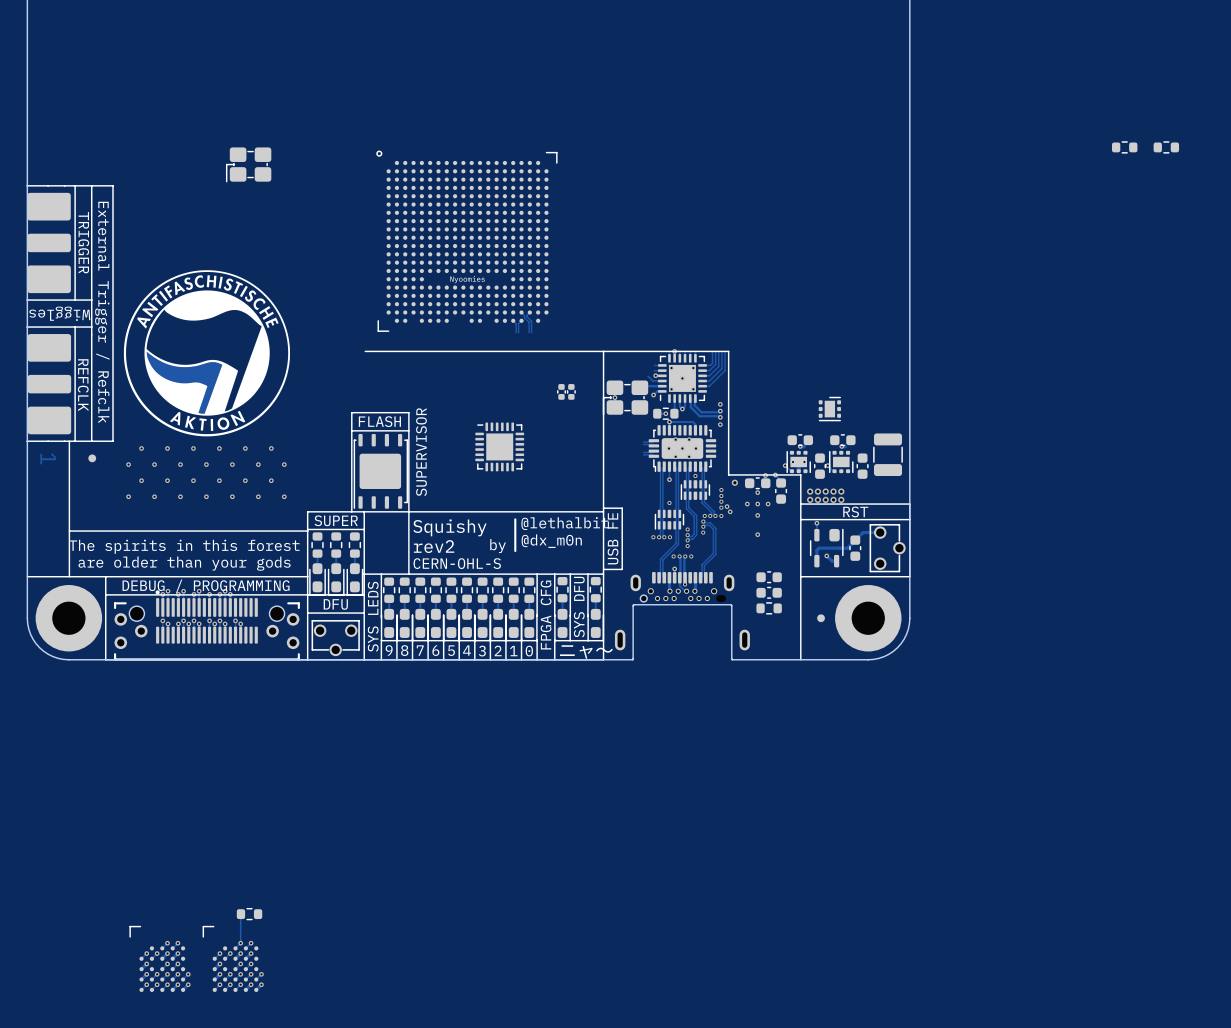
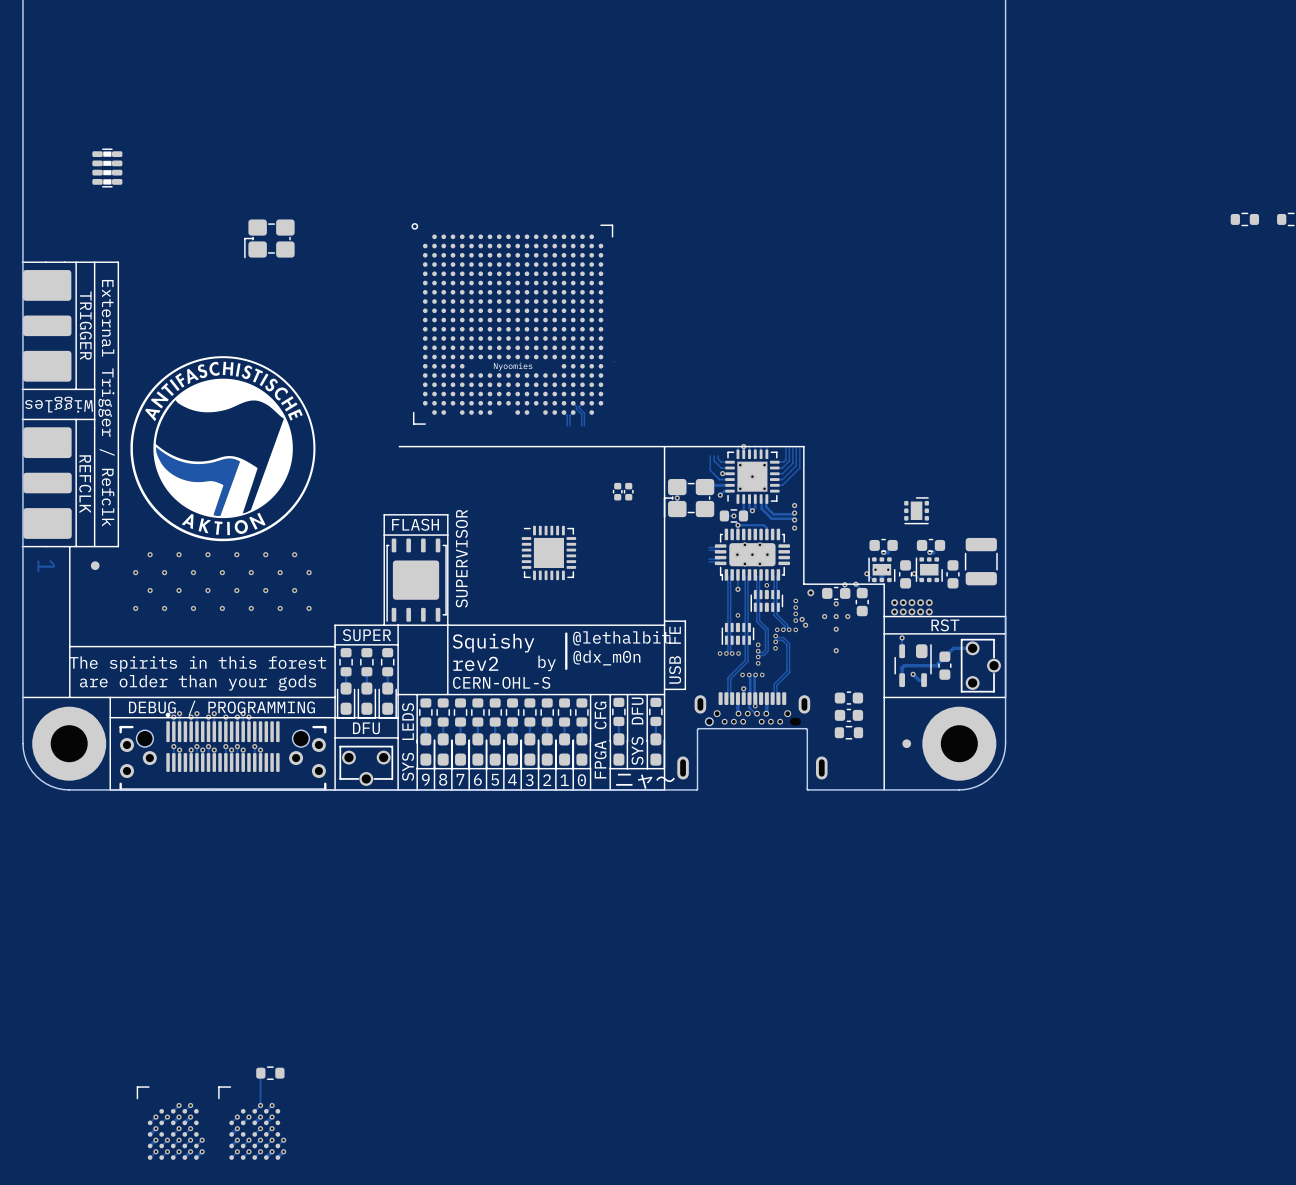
part: none -> (107, 168)
track: none -> (710, 455) (710, 470) (714, 474)
track: none -> (714, 455) (714, 461) (721, 467)
track: none -> (718, 455) (721, 462)

